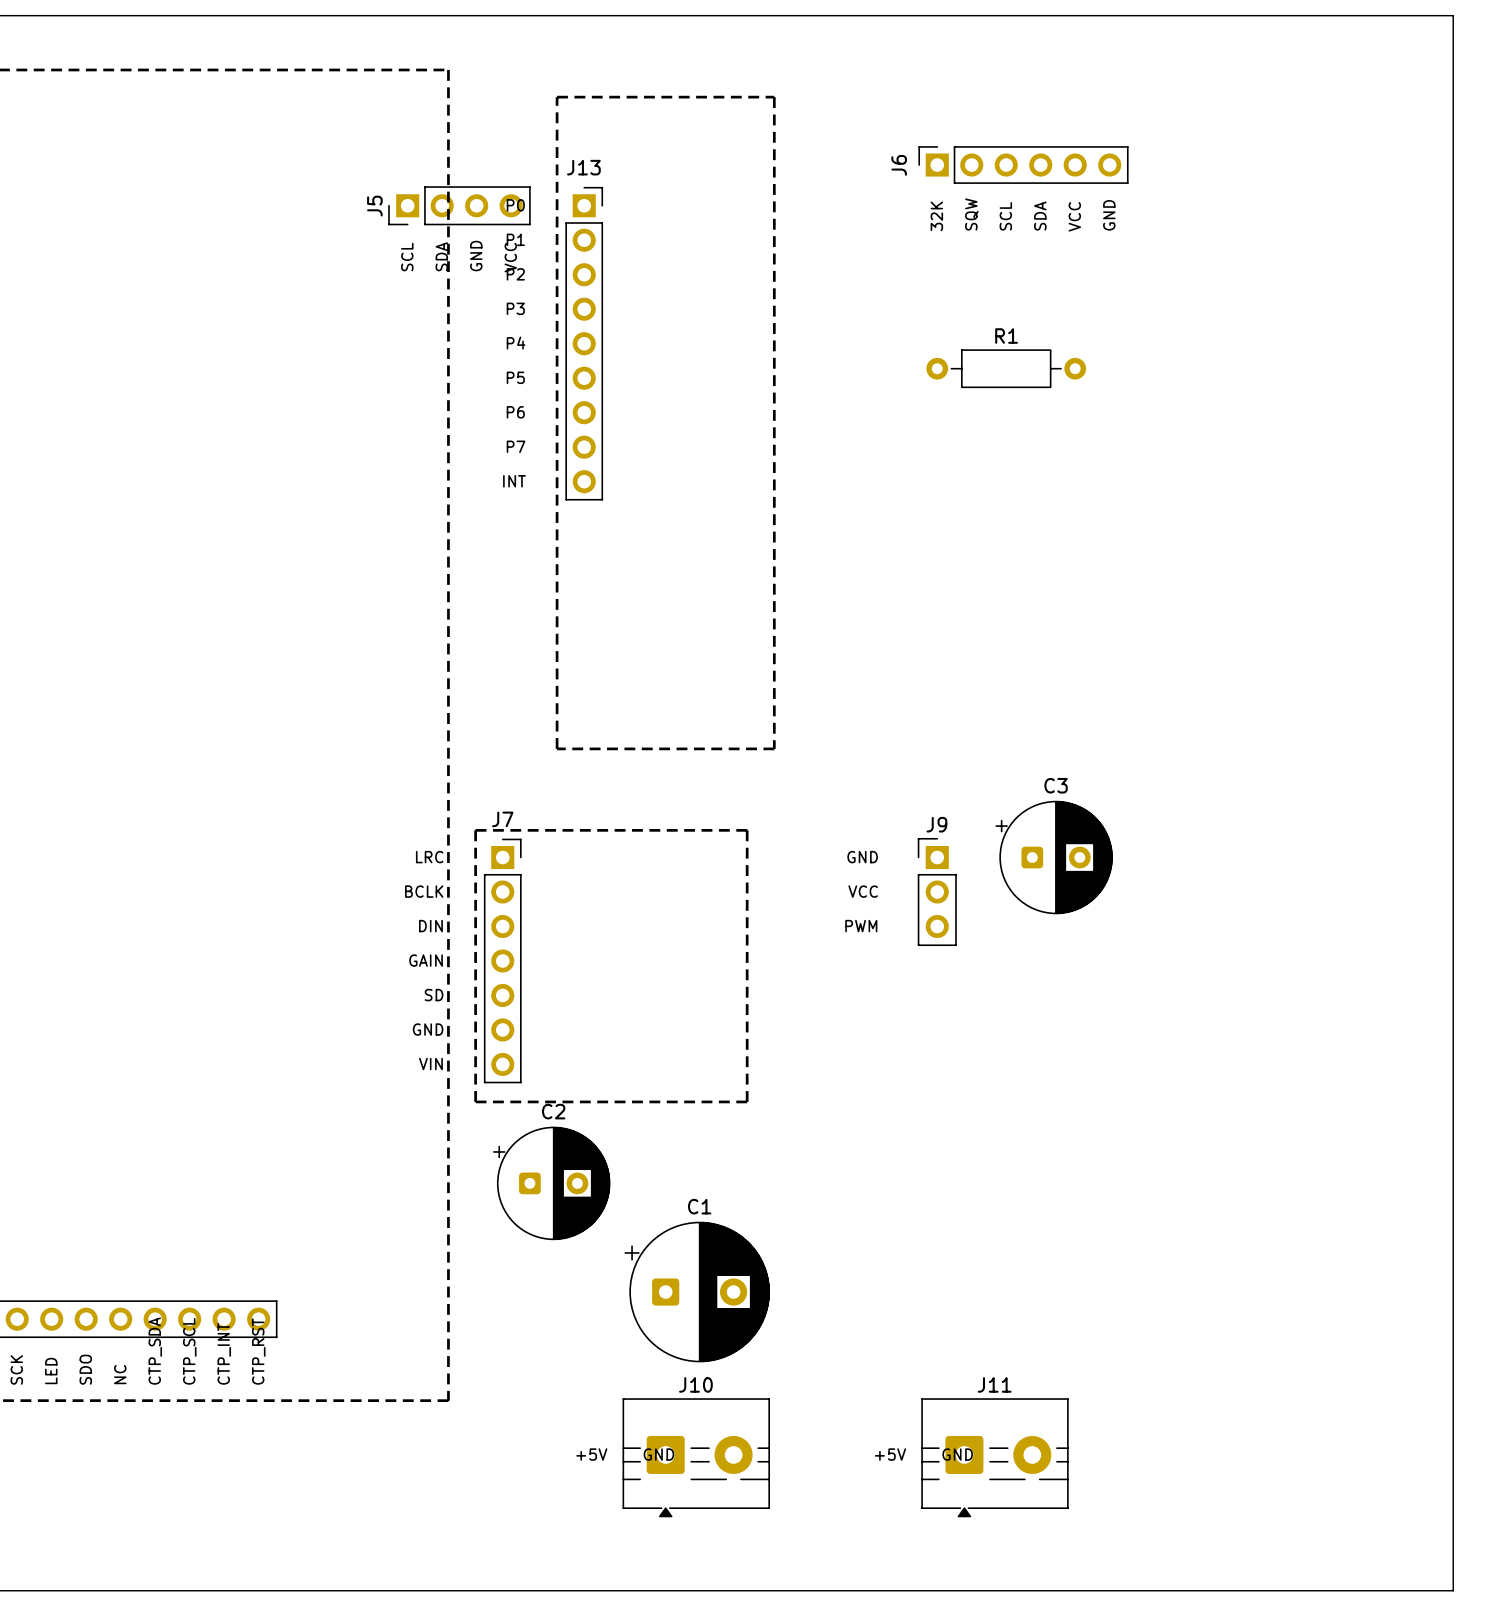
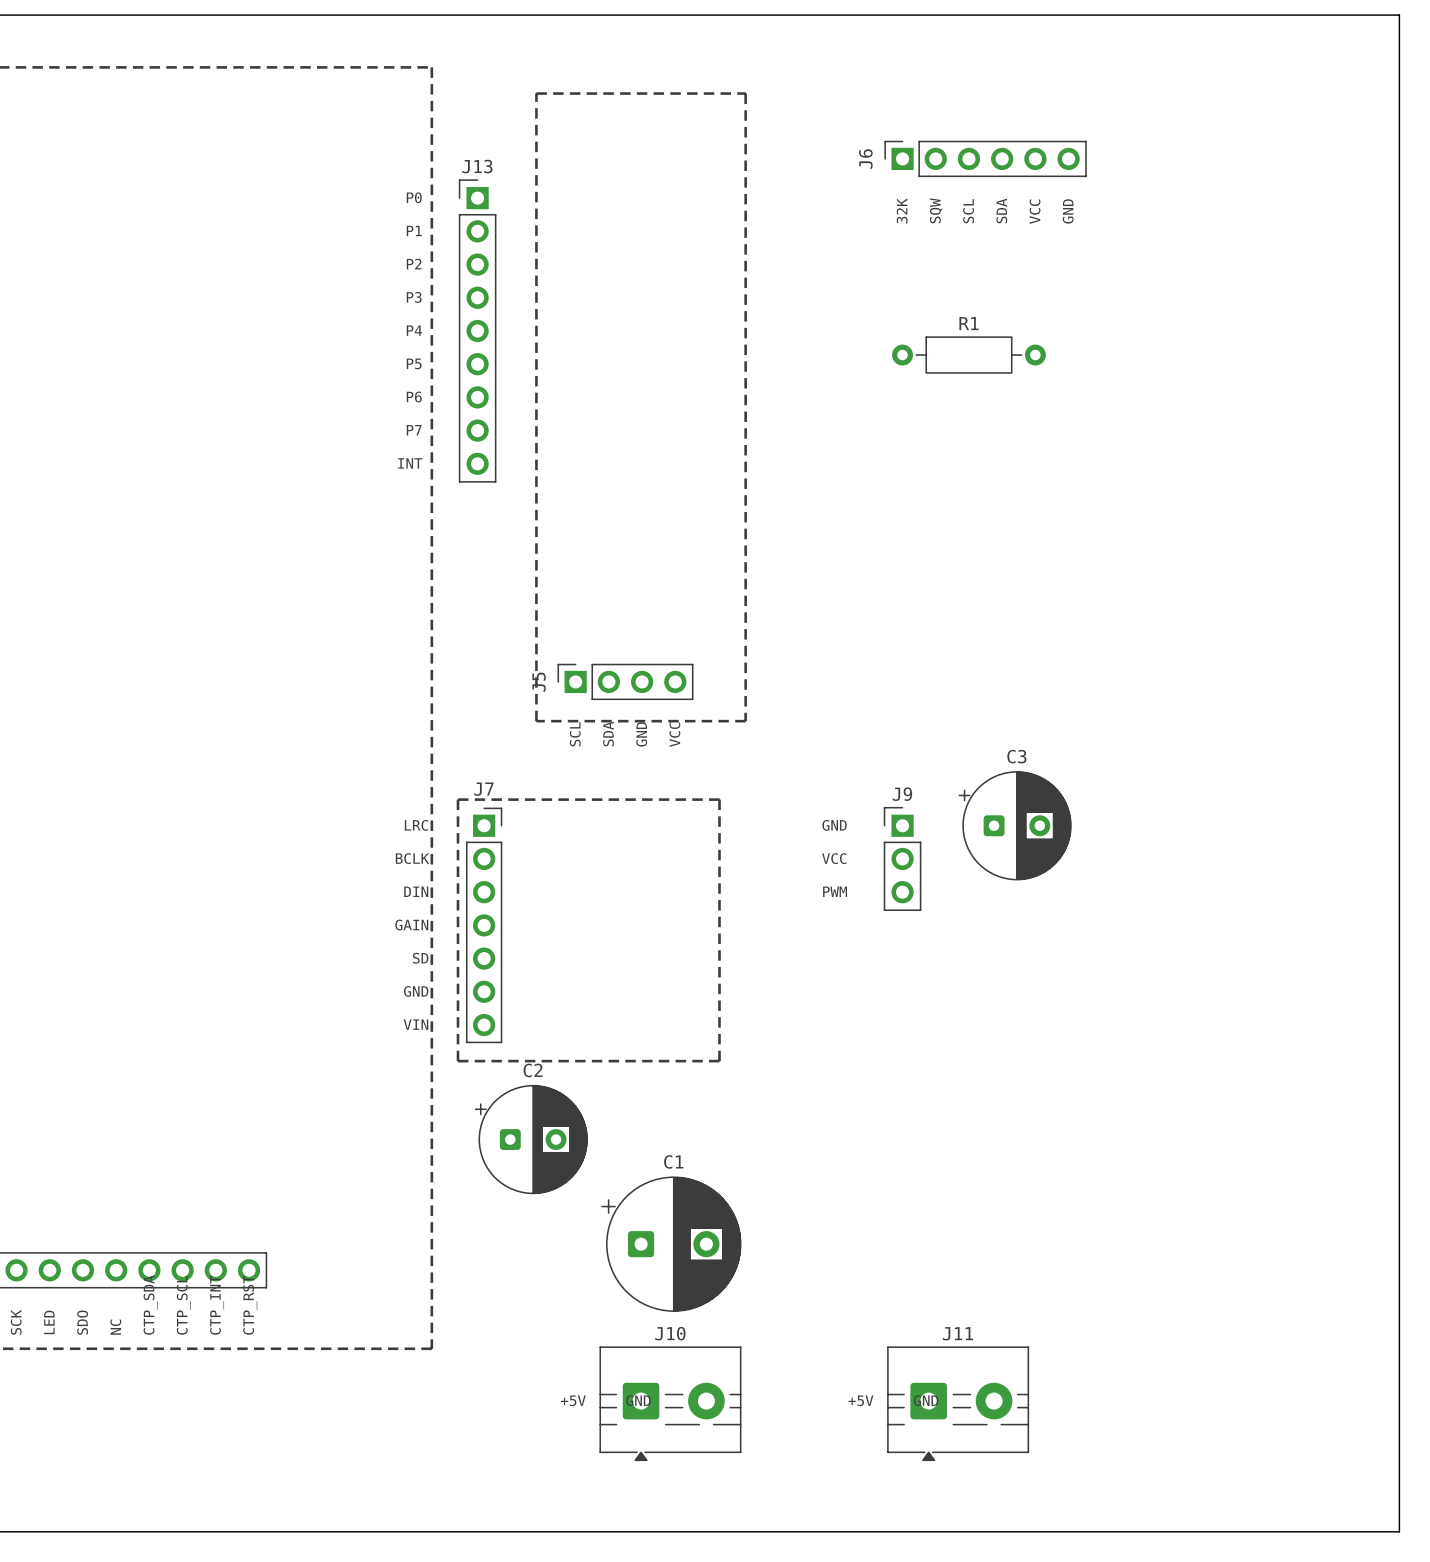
J5 footprint: [388, 186, 531, 226] -> [557, 663, 694, 701]
J13 footprint: [565, 186, 604, 501] -> [458, 179, 497, 483]
text position: P0 (515, 205) -> P0 (414, 197)
text position: P1 (515, 239) -> P1 (414, 230)
text: SDA (441, 256) -> none
text: GND (476, 256) -> none
text: SCL (407, 257) -> none
text: VCC (510, 257) -> none
text position: P2 (515, 274) -> P2 (414, 264)
text position: P3 (515, 308) -> P3 (414, 297)
text position: P4 (516, 343) -> P4 (414, 330)
text position: P5 (515, 377) -> P5 (414, 363)
text position: P6 (515, 412) -> P6 (414, 397)
text position: P7 (516, 446) -> P7 (414, 430)
text position: INT (514, 481) -> INT (410, 463)
text: none -> GND (641, 734)
text: none -> SCL (575, 734)
text: none -> SDA (608, 733)
text: none -> VCC (674, 734)

